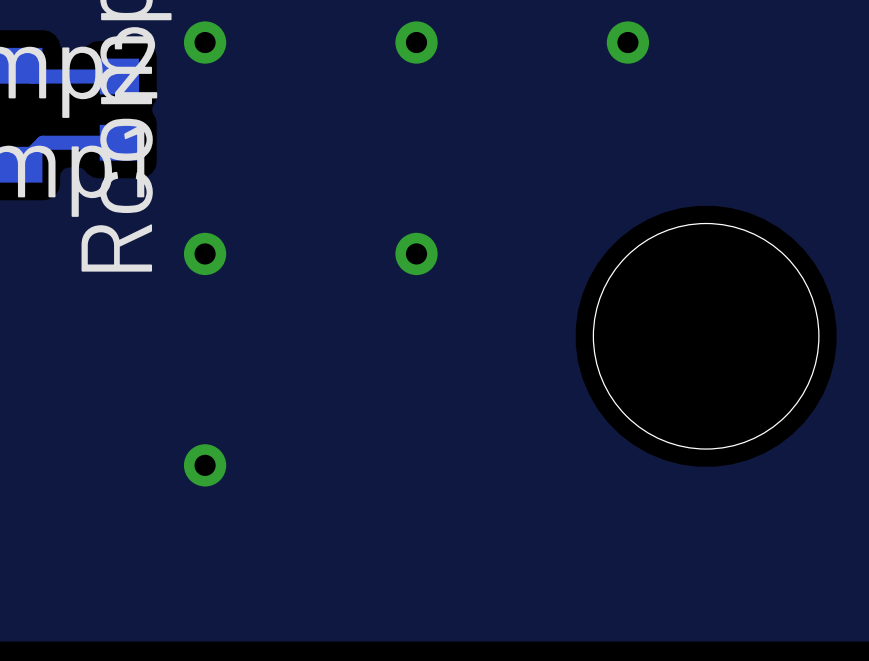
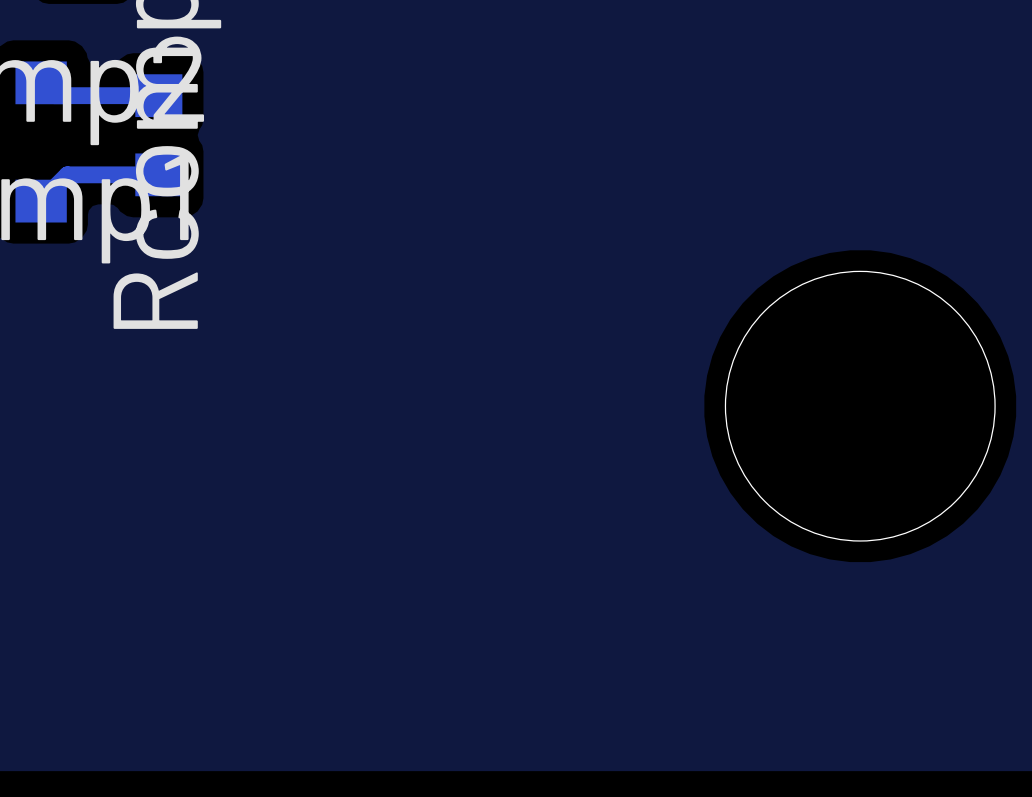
via: (205, 42) -> none
via: (416, 42) -> none
via: (627, 42) -> none
via: (205, 253) -> none
via: (416, 253) -> none
via: (205, 465) -> none

